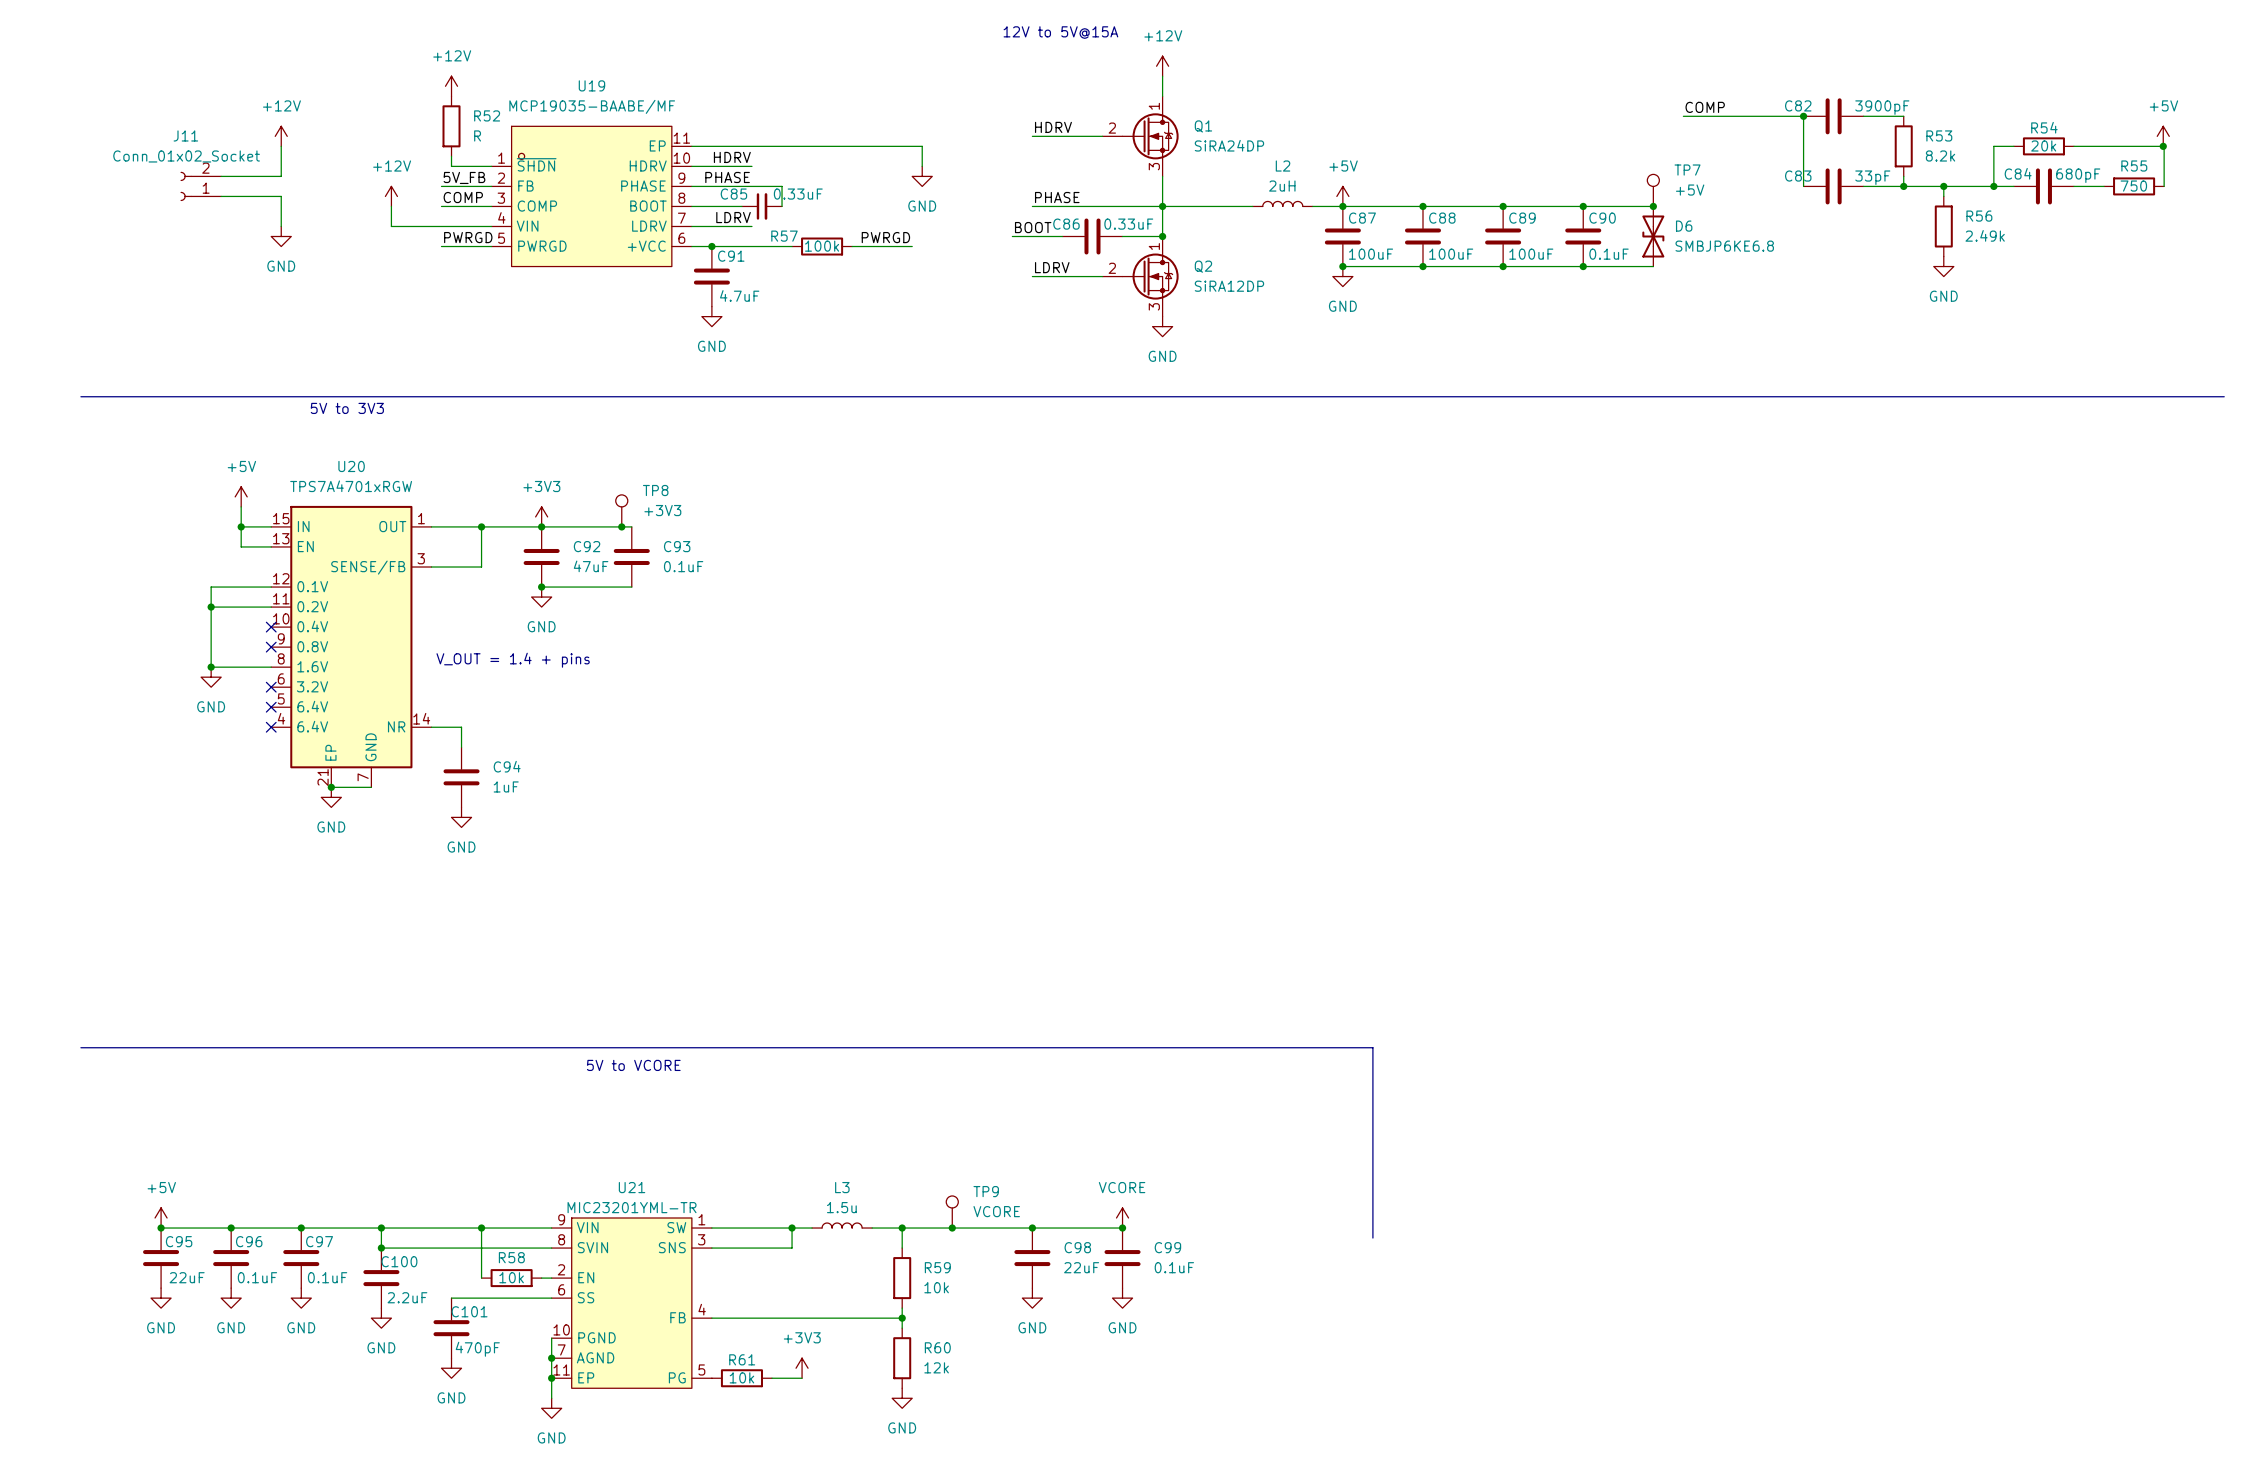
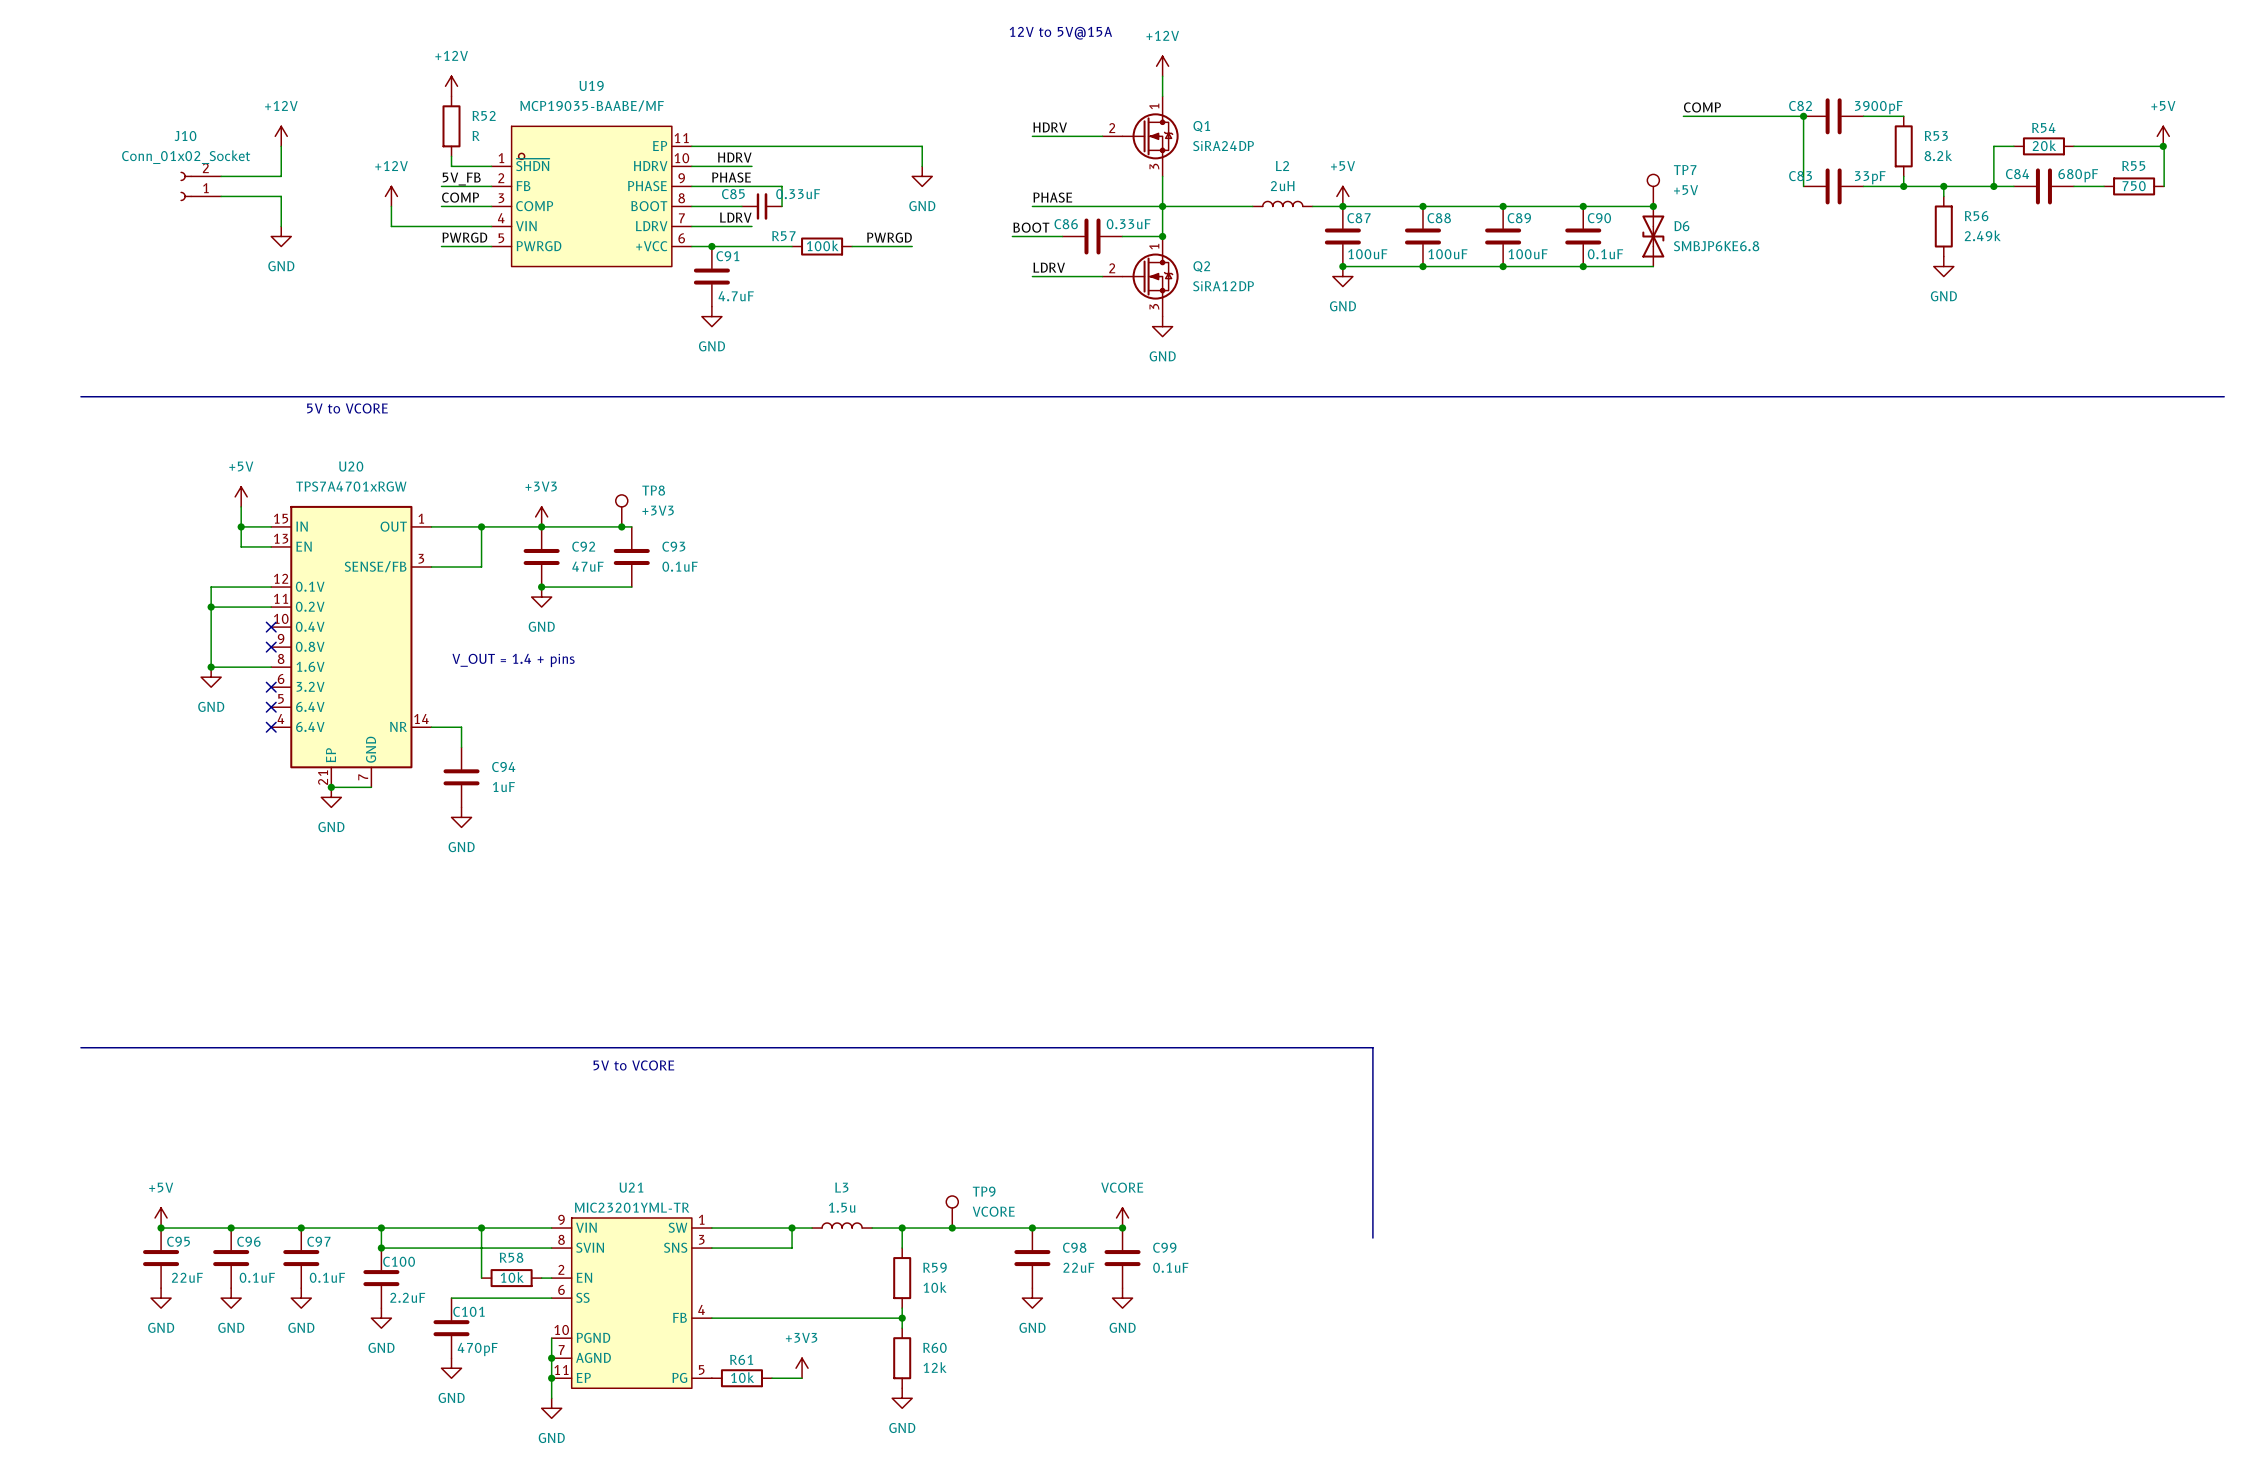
J11 name: J11 (185, 135) -> J10 (185, 136)
text: 5V to 3V3 (347, 408) -> 5V to VCORE (347, 408)

